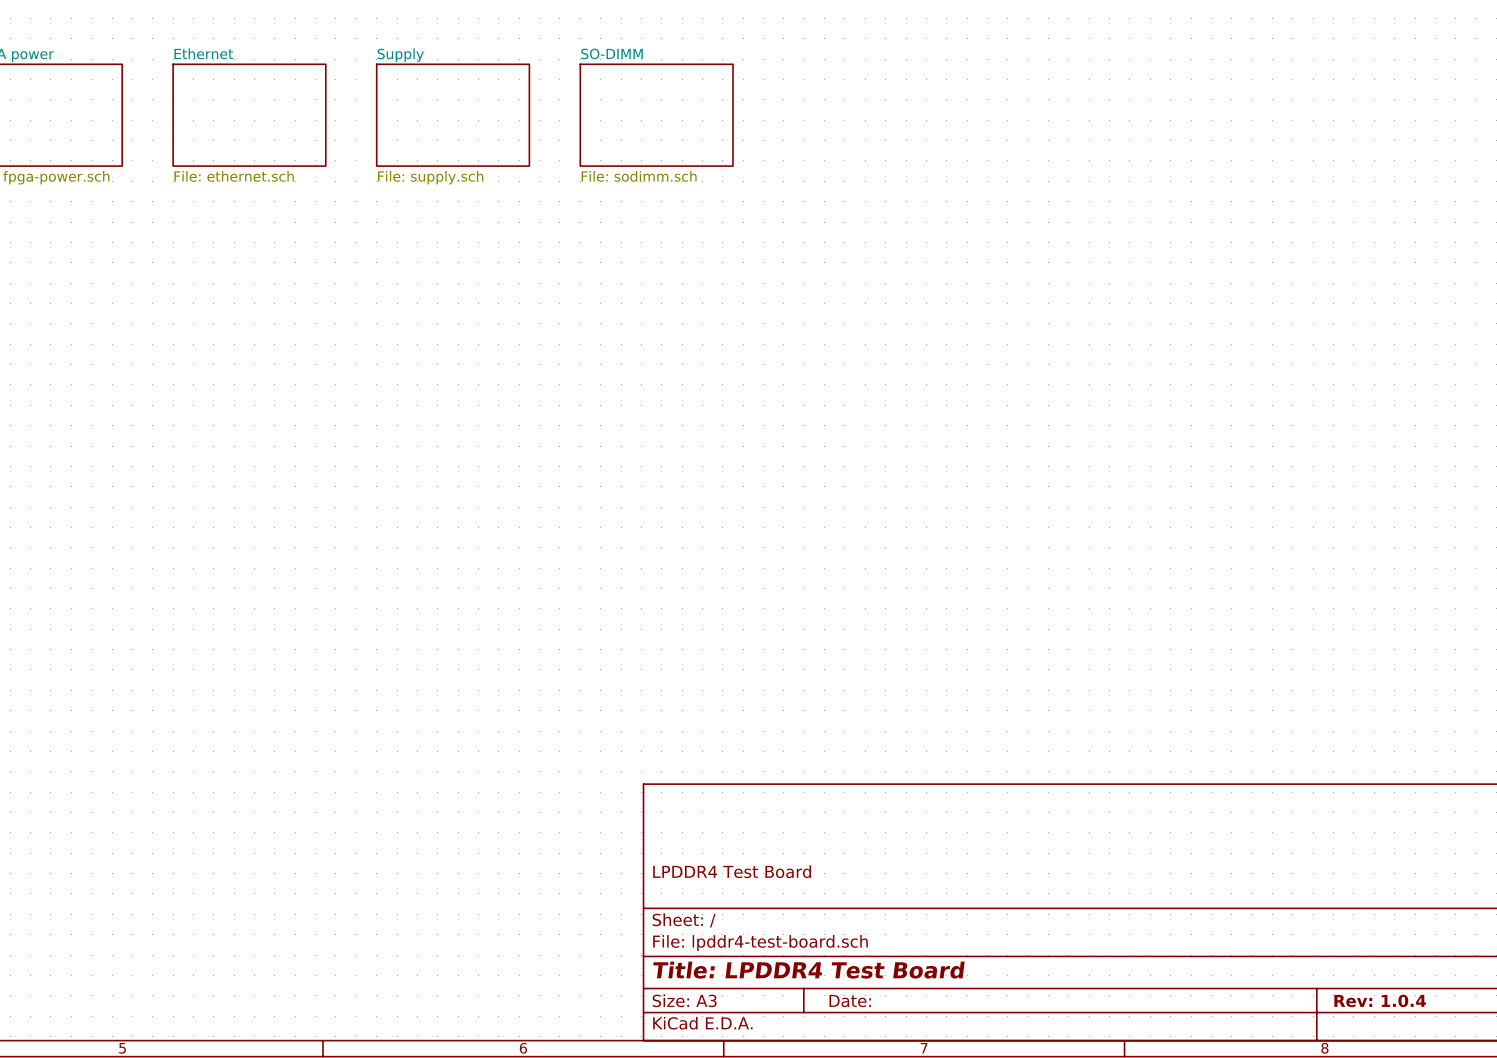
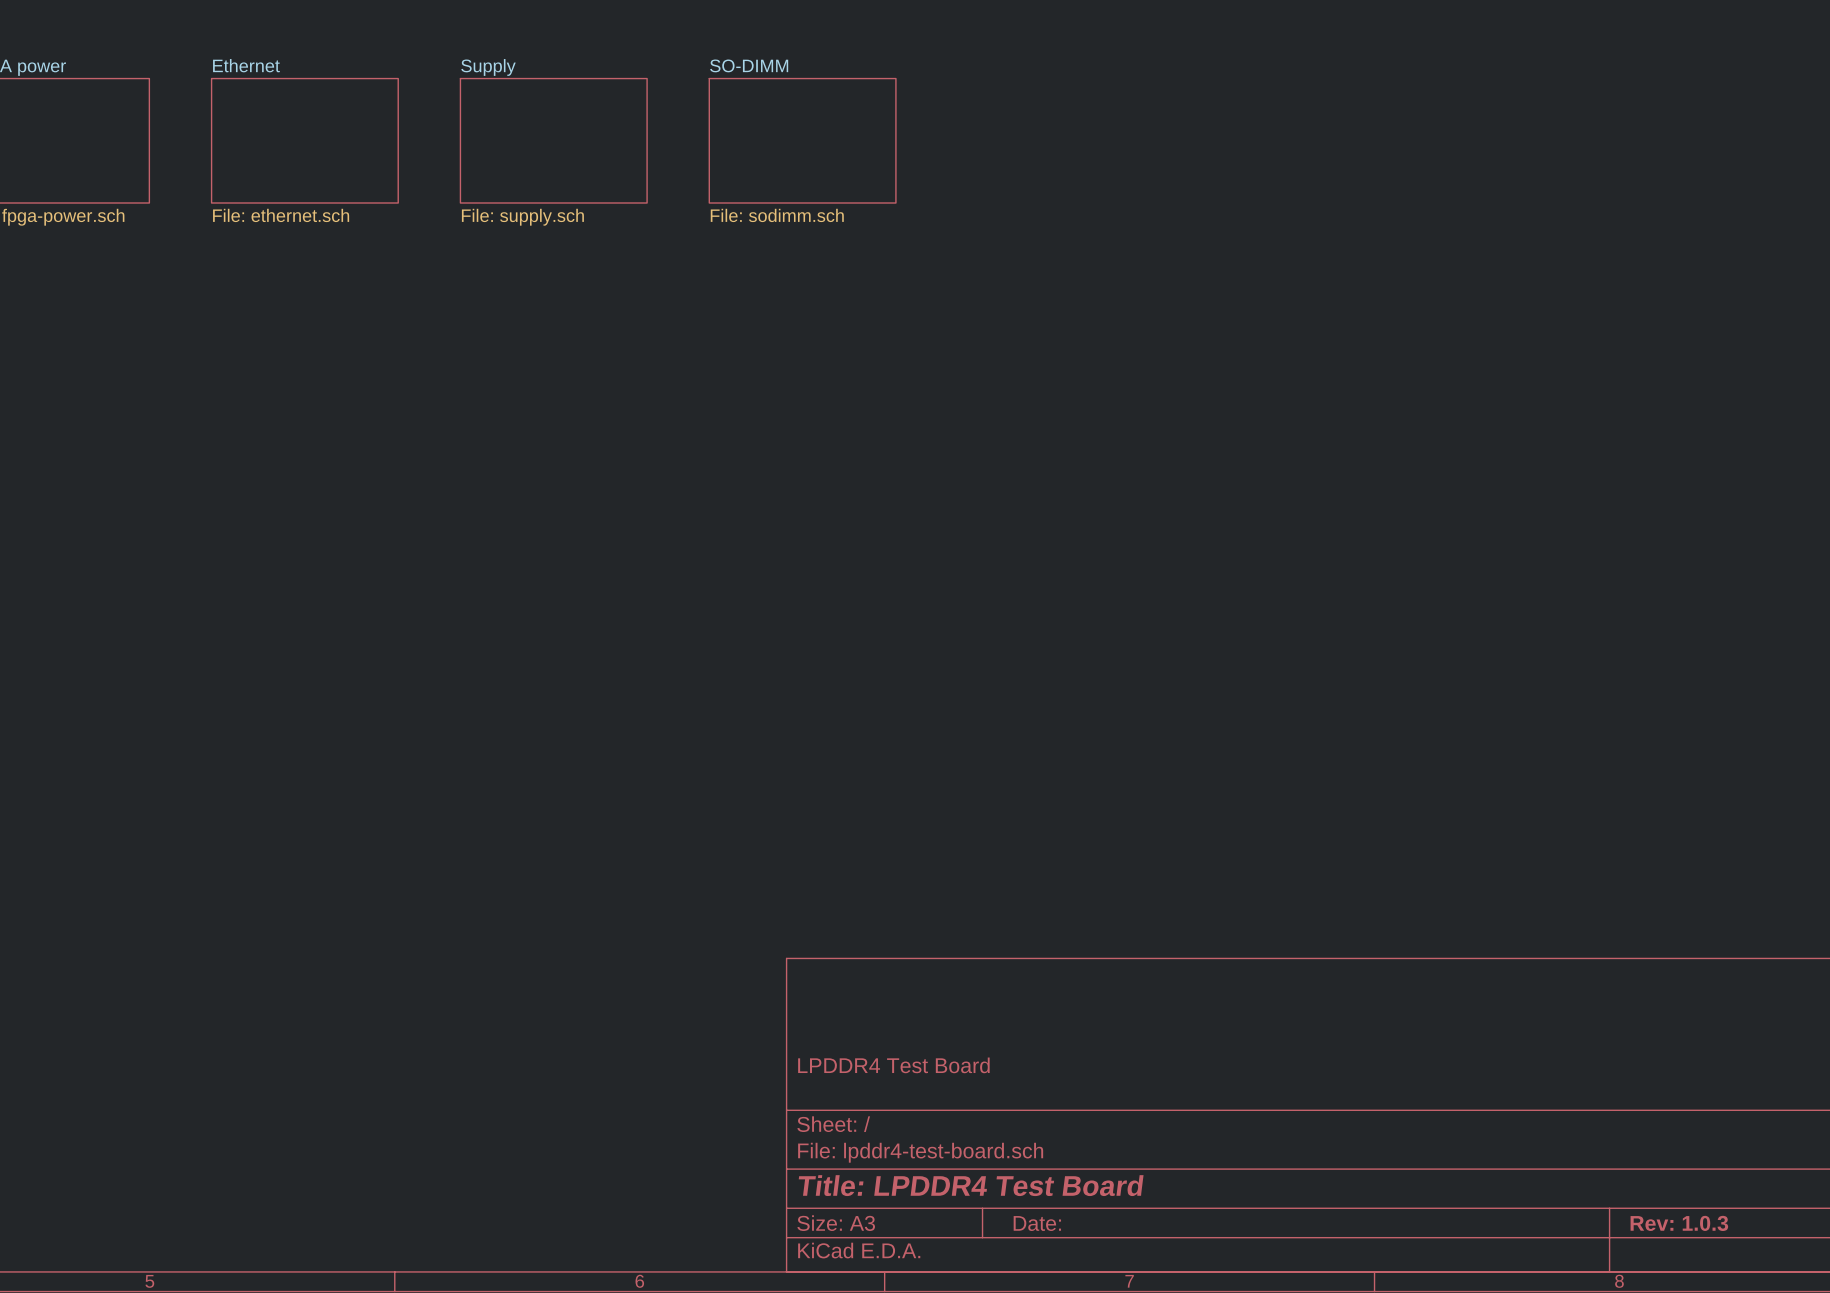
title block: Rev: 1.0.4 (1380, 1000) -> Rev: 1.0.3 (1679, 1223)

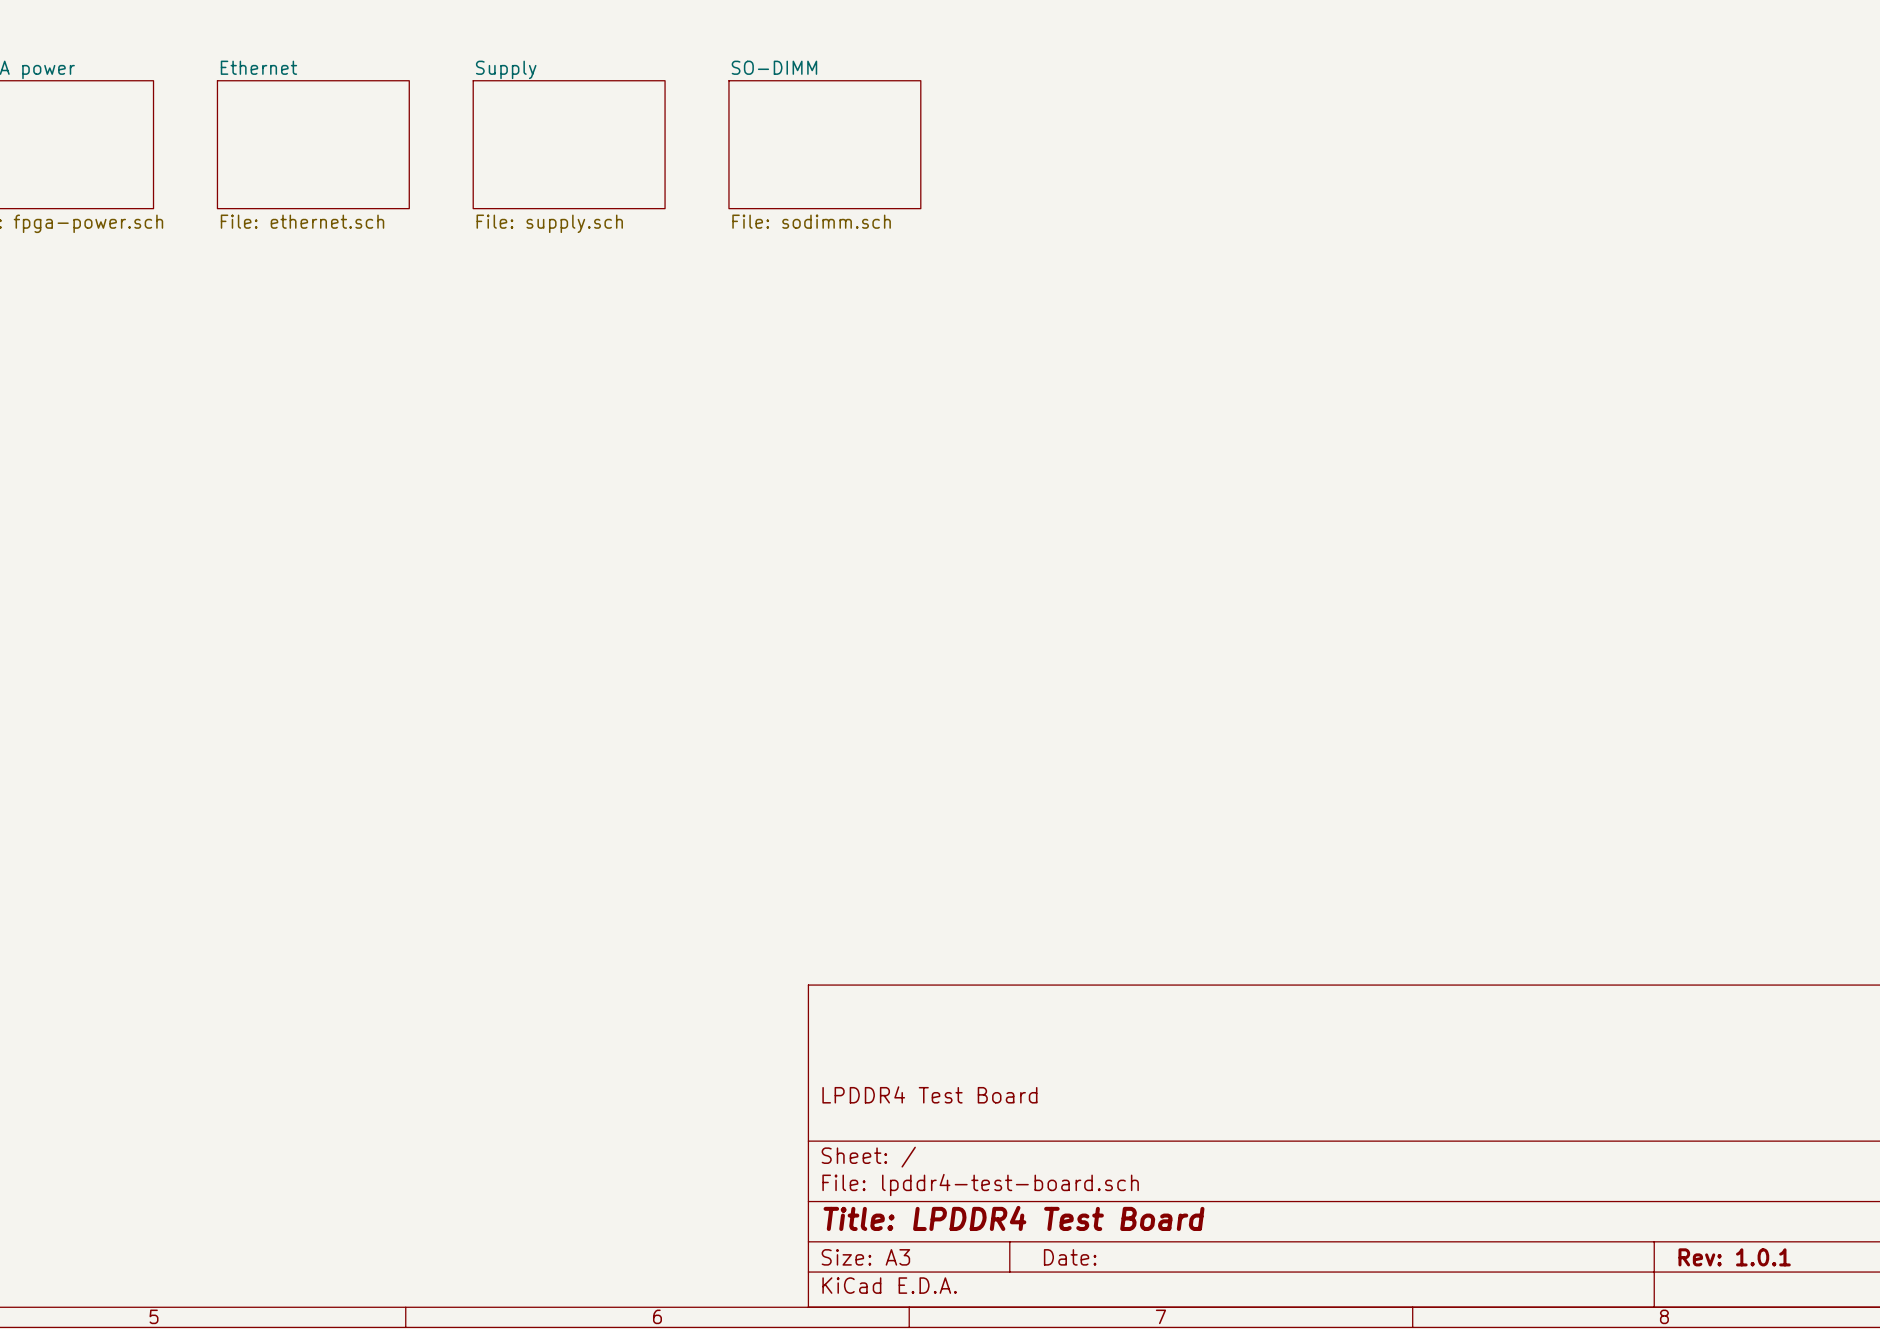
title block: Rev: 1.0.3 (1679, 1223) -> Rev: 1.0.1 (1734, 1257)

